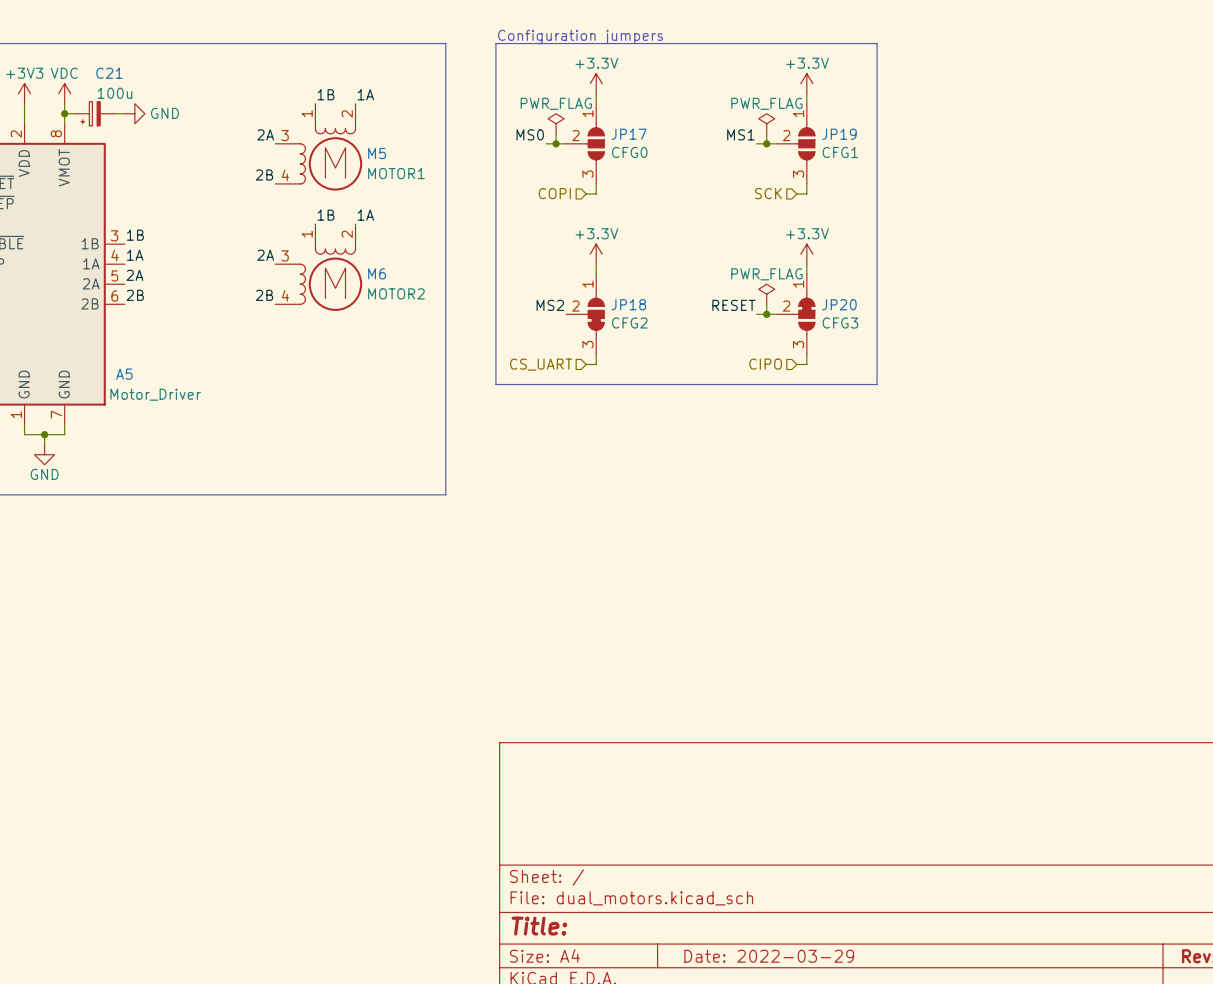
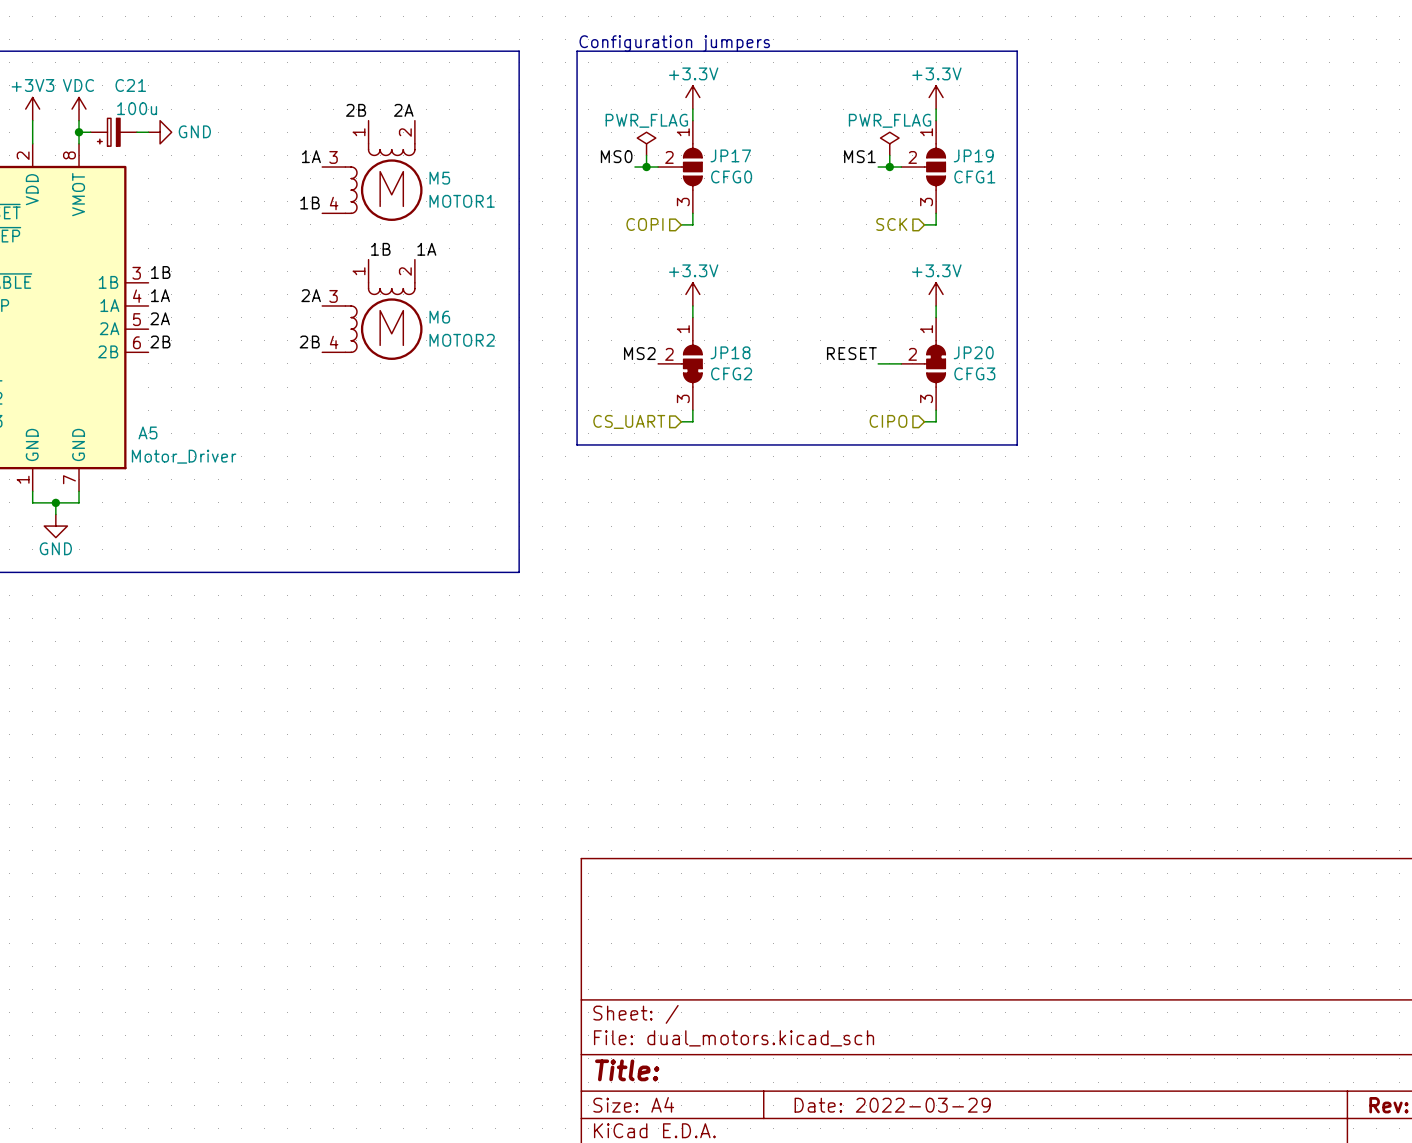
label: 1B (325, 94) -> 2B (356, 110)
label: 1A (365, 94) -> 2A (403, 110)
label: 2A (265, 134) -> 1A (311, 156)
label: 2B (264, 175) -> 1B (310, 203)
power symbol: PWR_FLAG (766, 294) -> none
wire: (766, 304) (766, 314) -> none
junction: (766, 314) -> none

